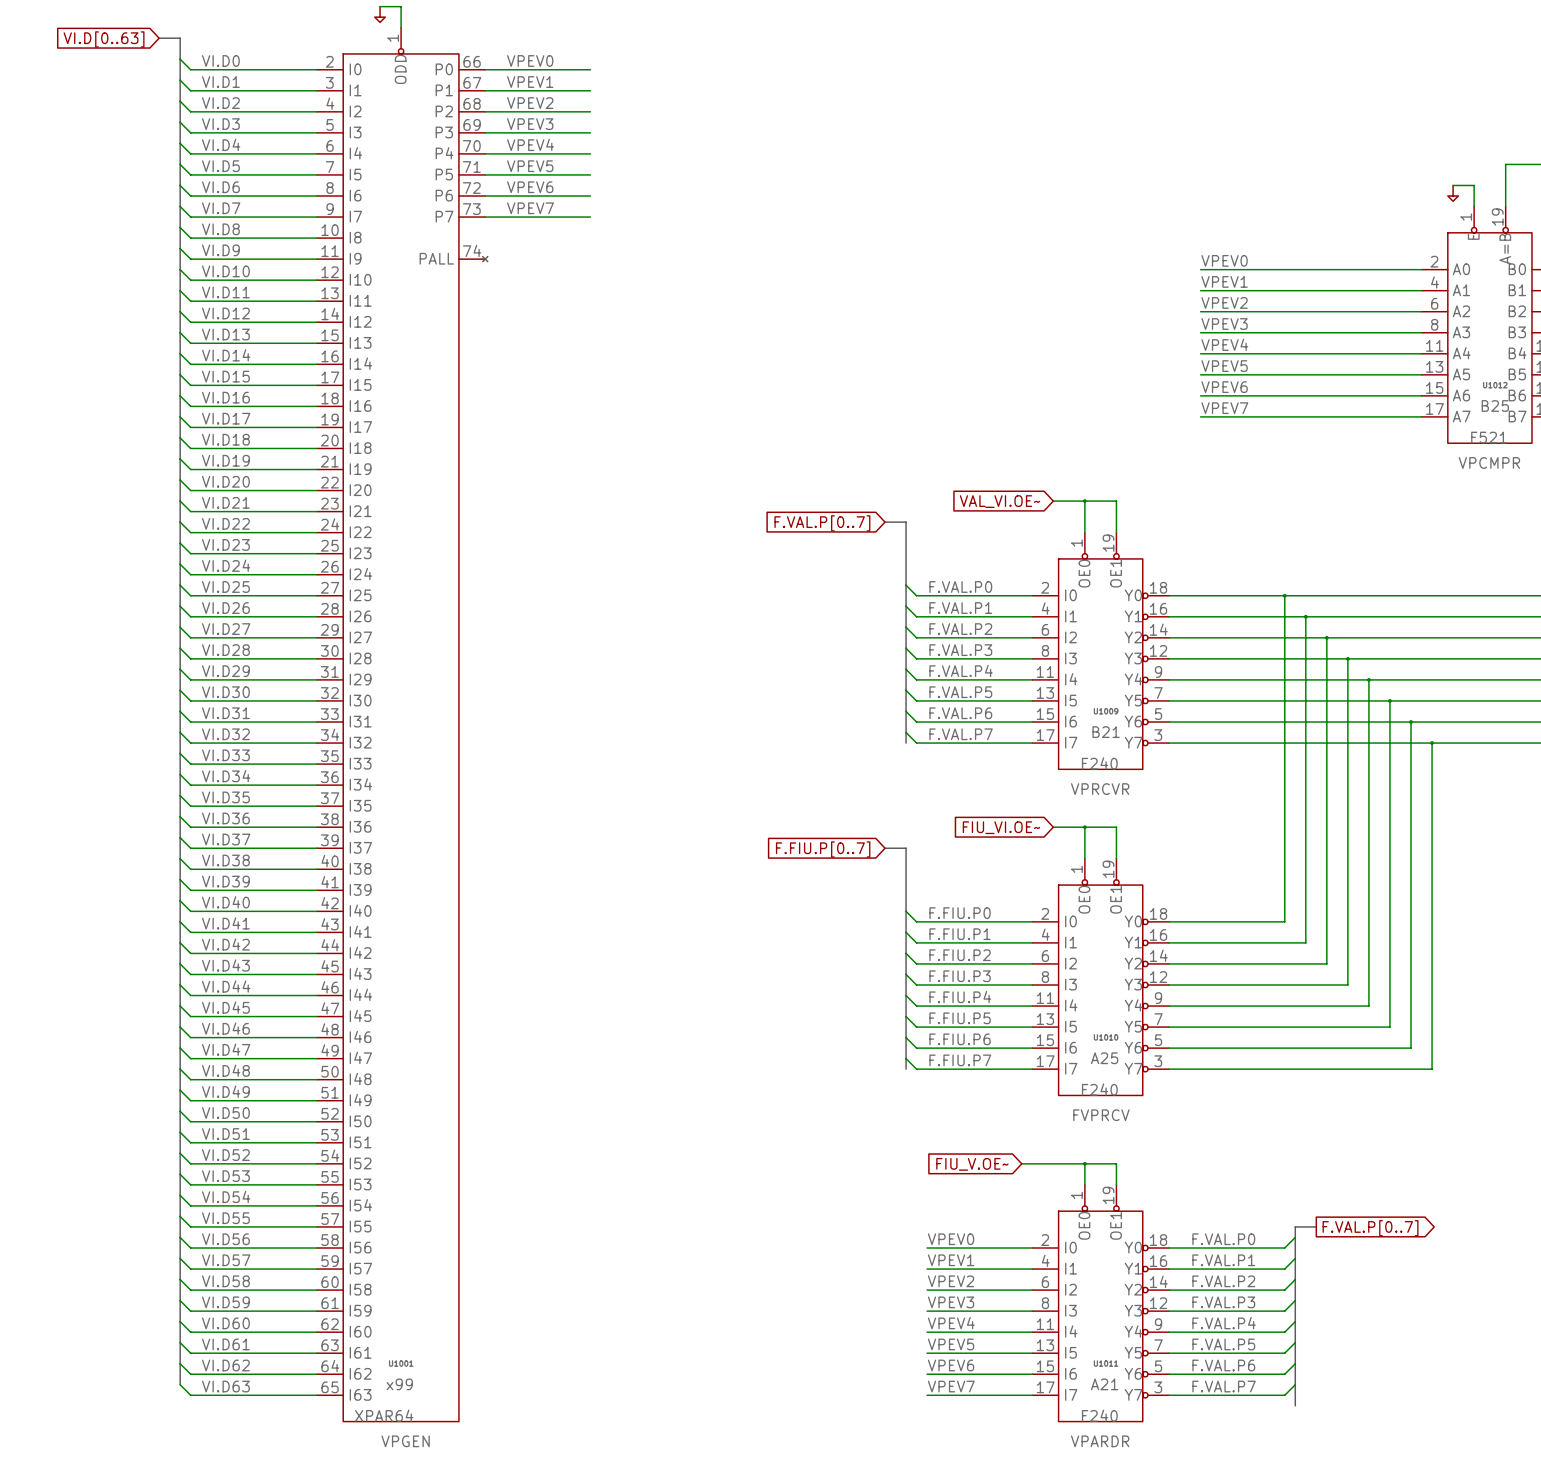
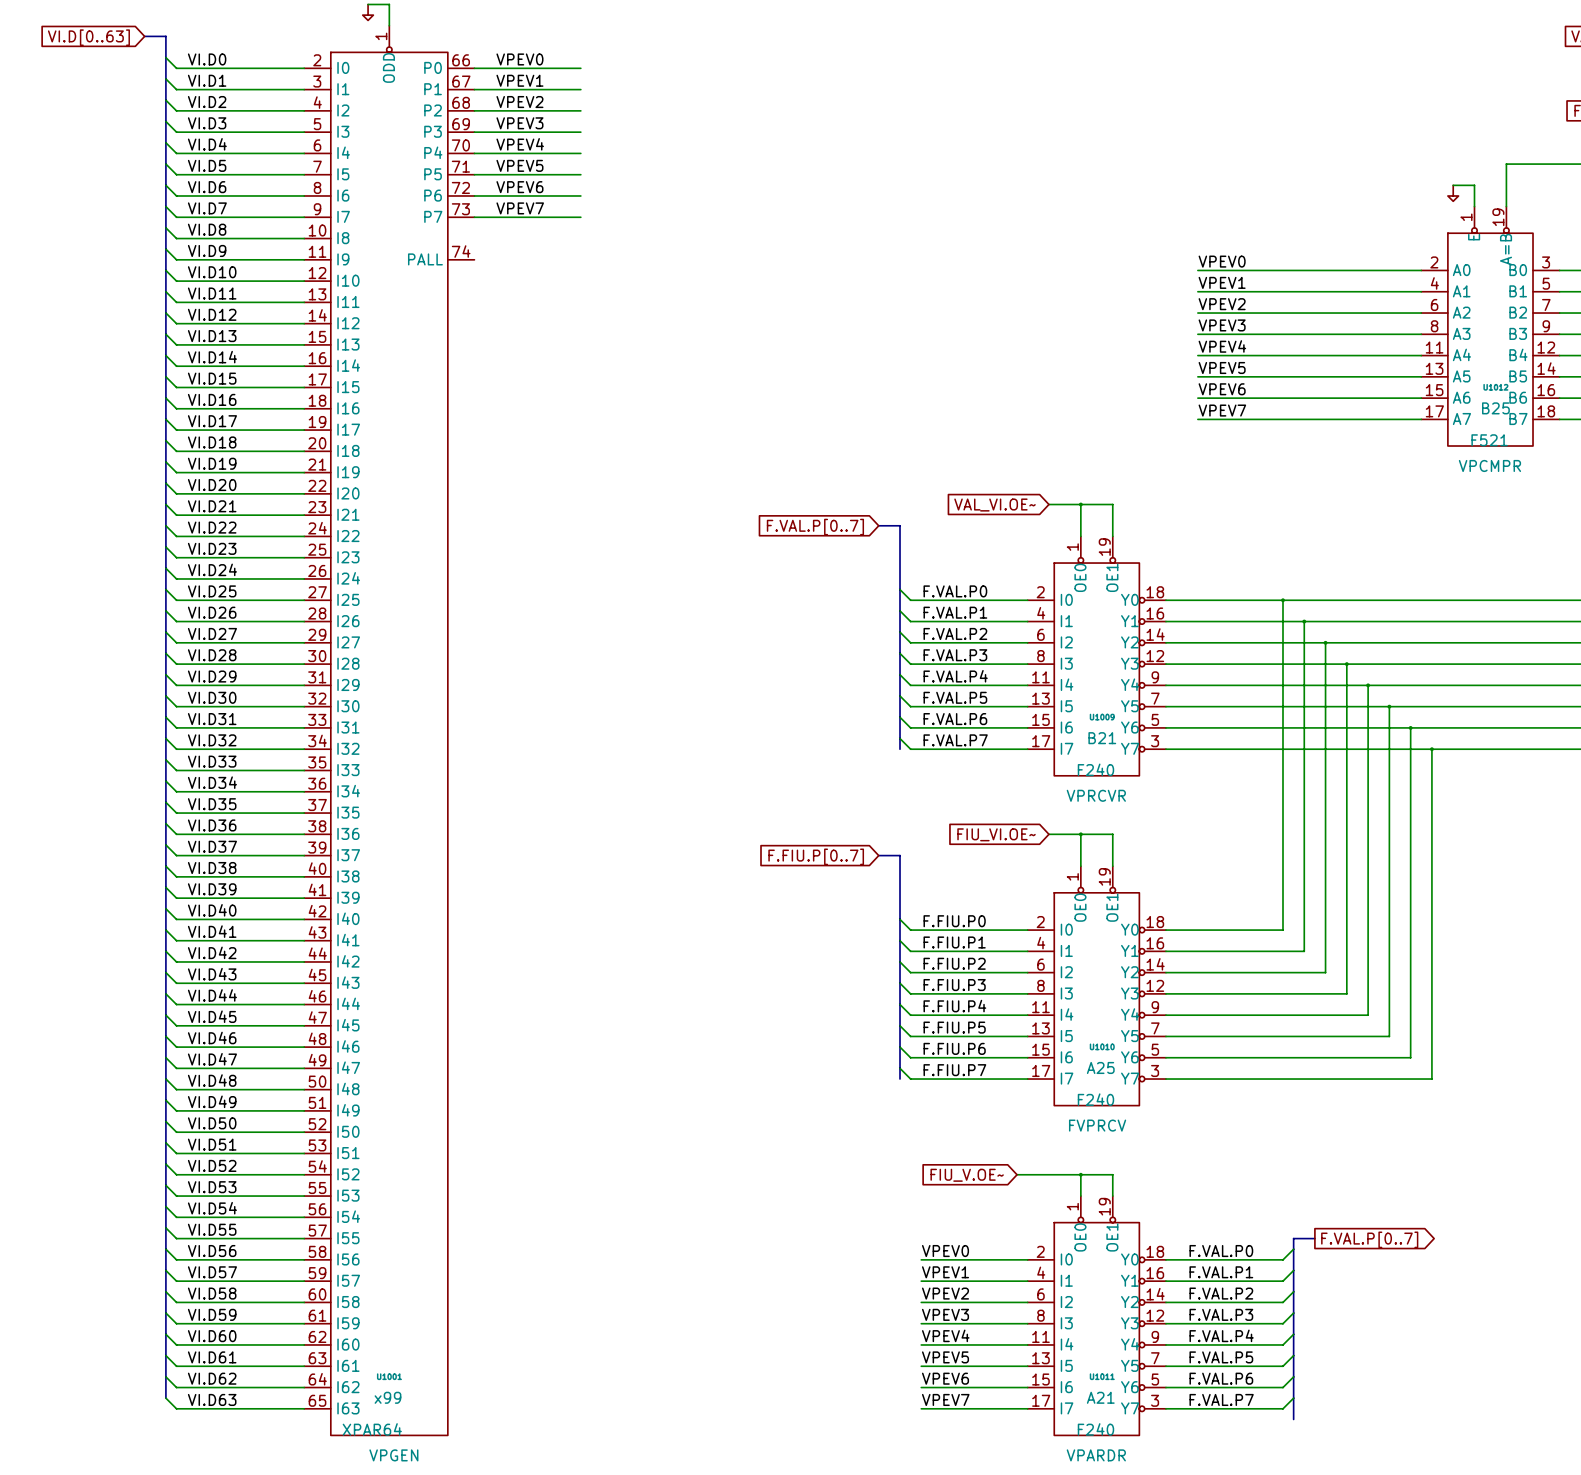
no-connect mark: (485, 259) -> none

